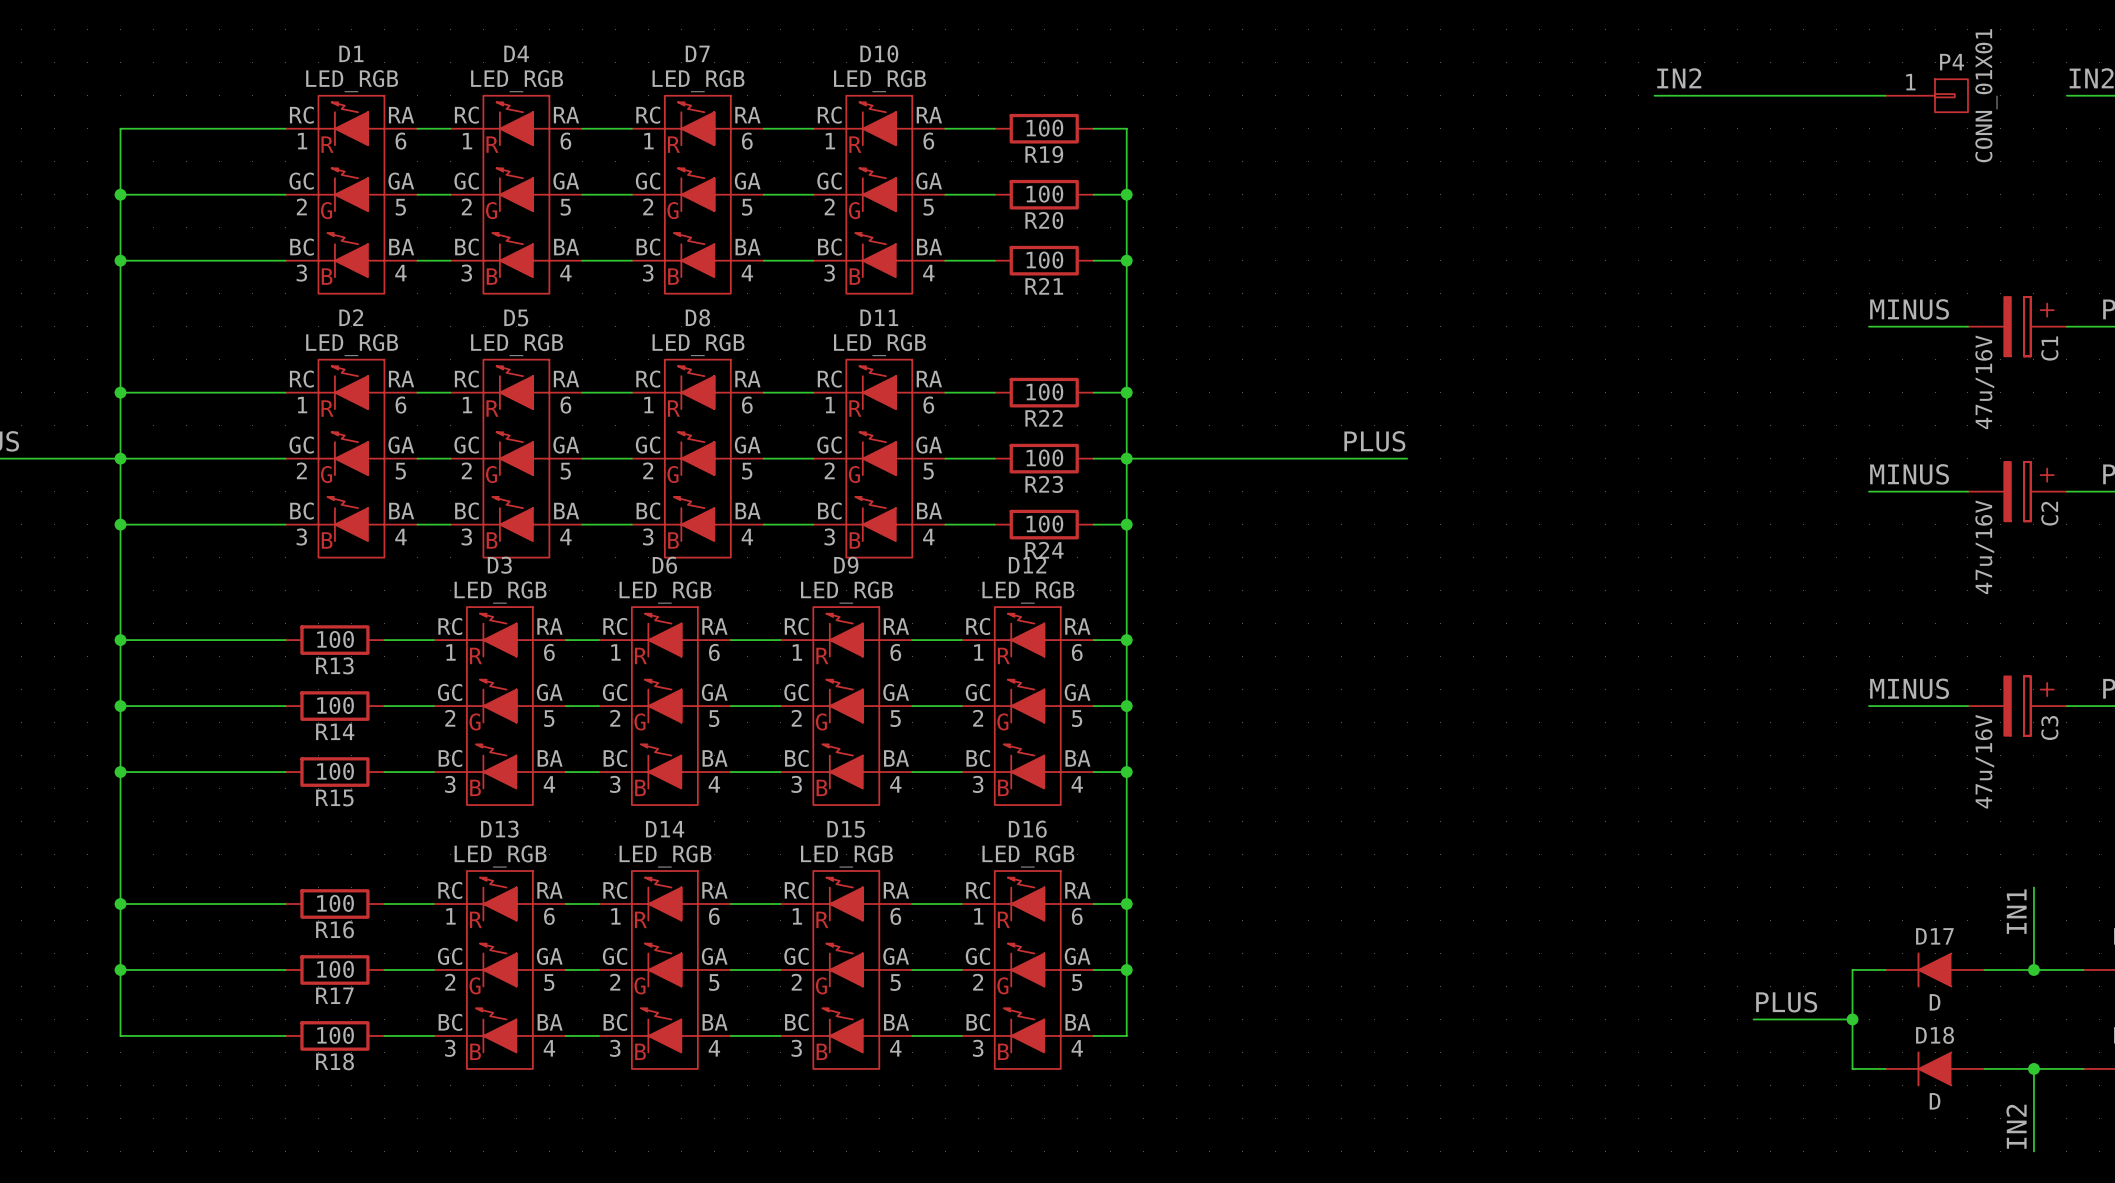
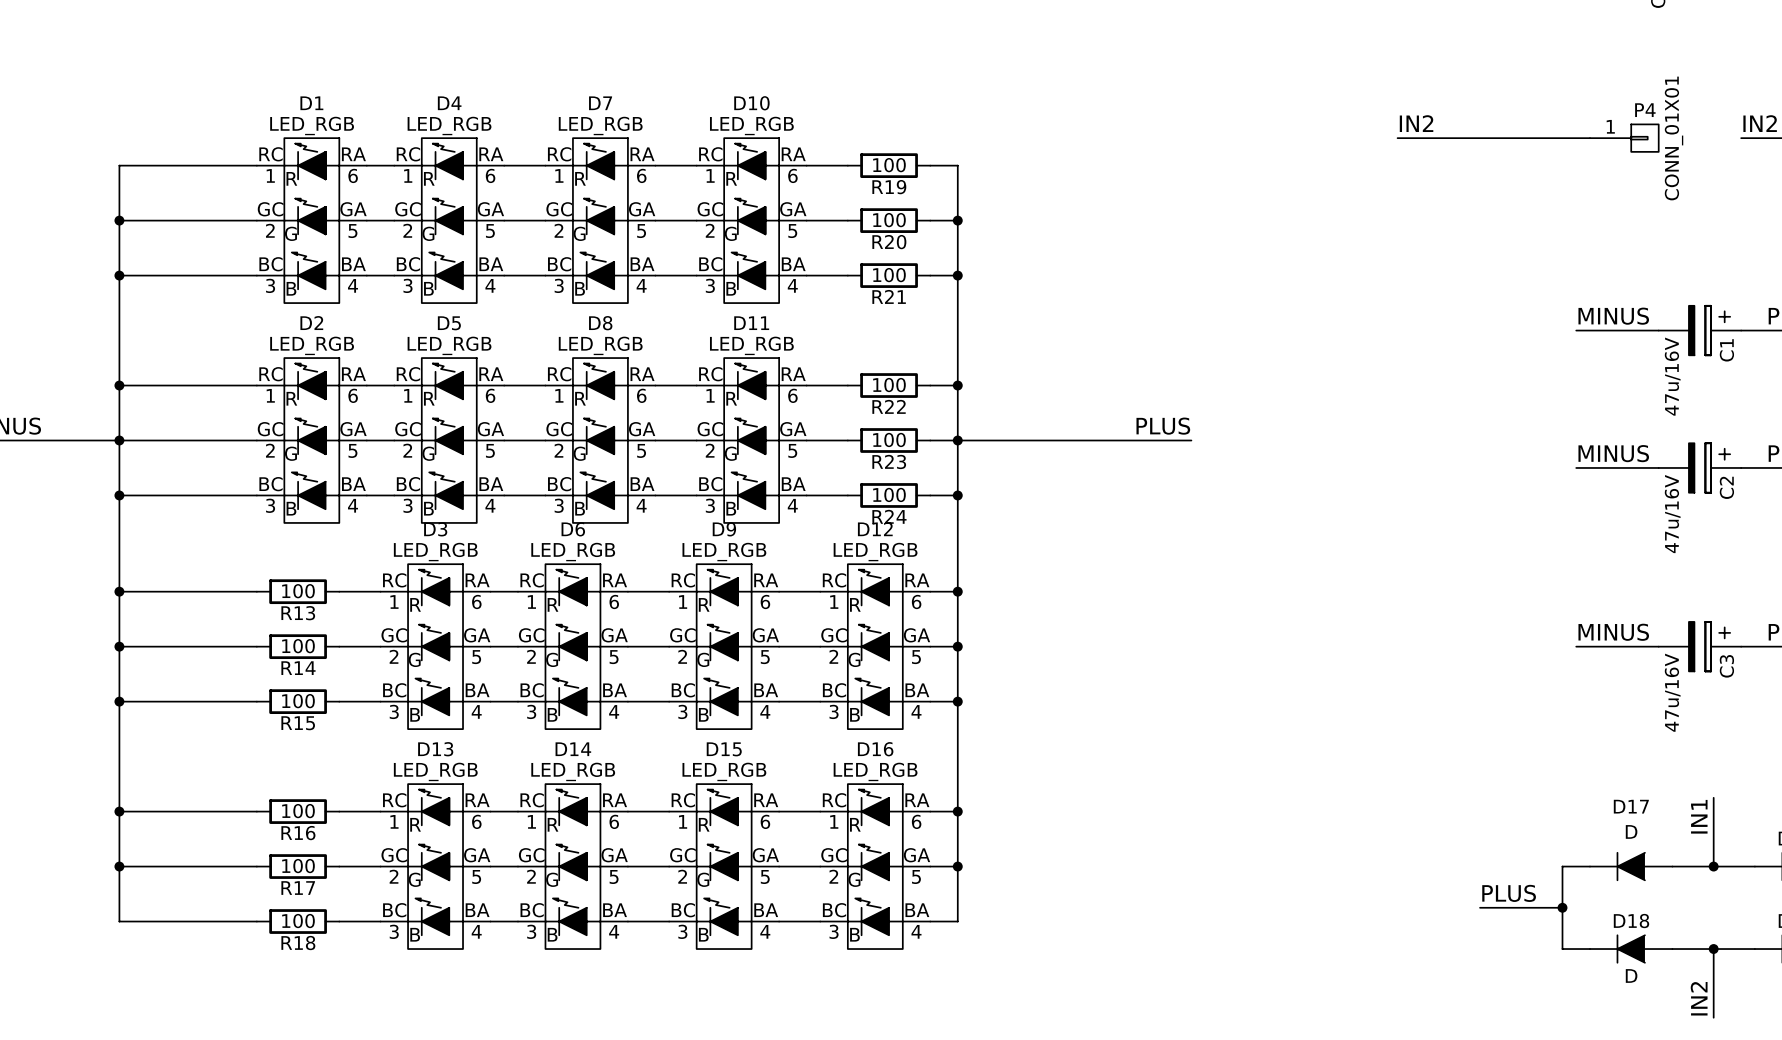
D17 name position: D17 (1934, 936) -> D17 (1631, 806)
D17 value position: D (1935, 1002) -> D (1631, 831)

